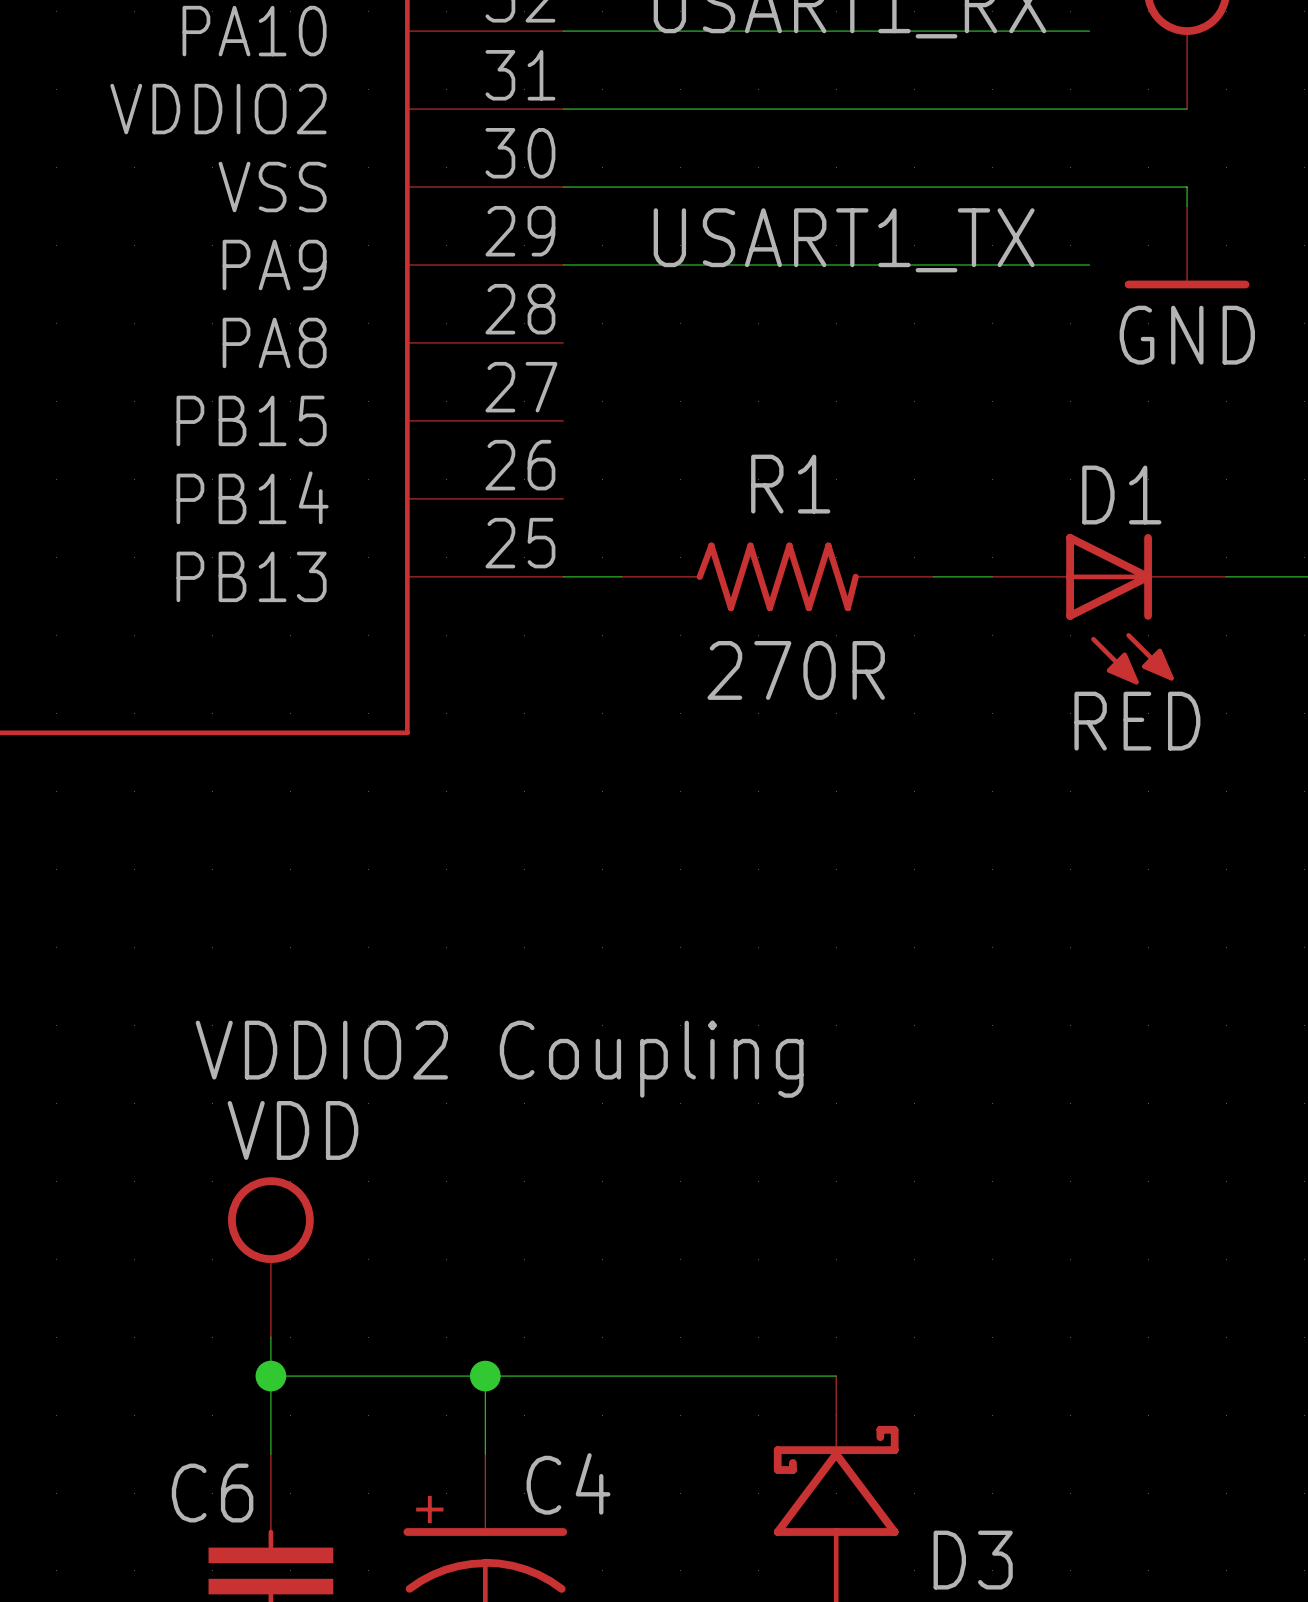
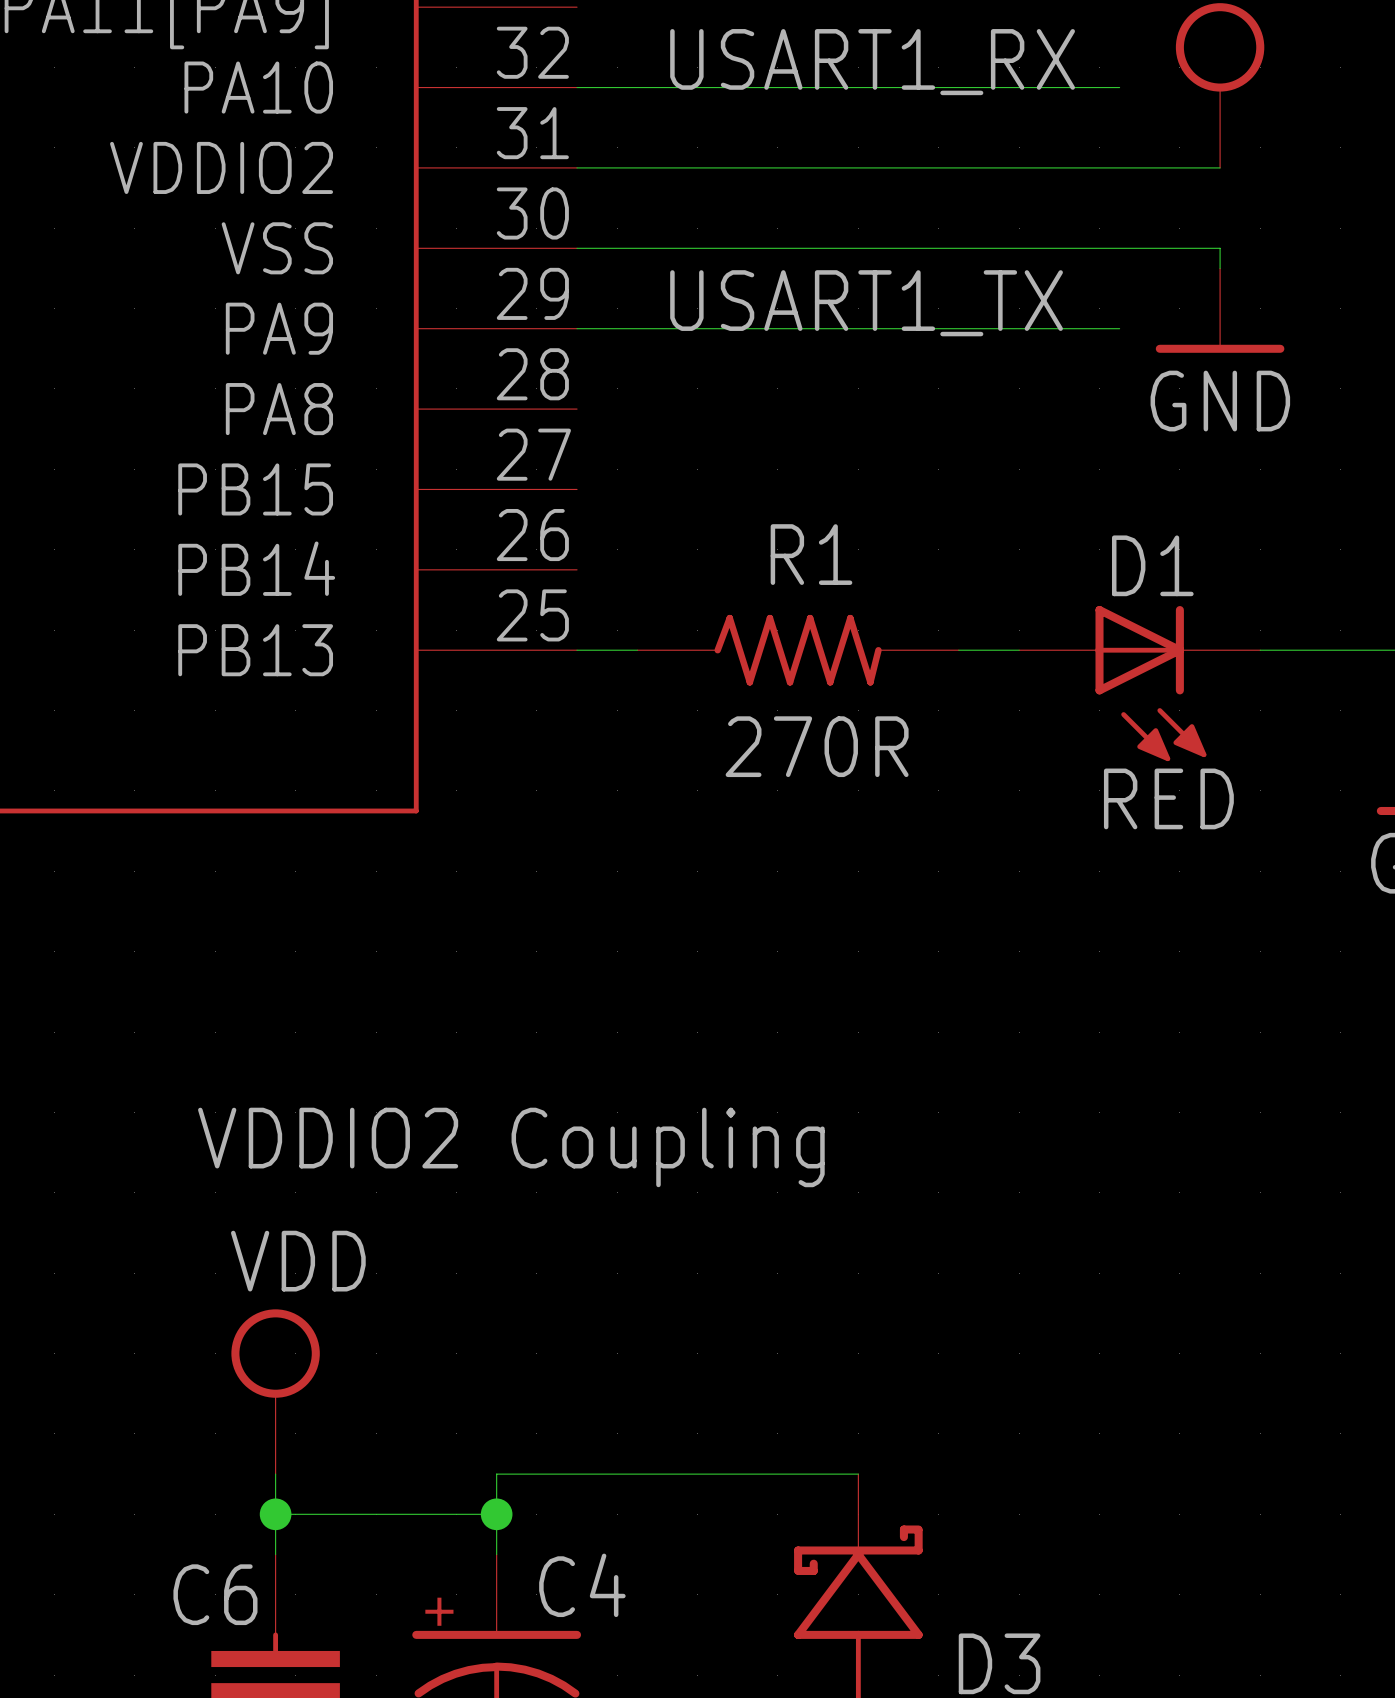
power symbol position: VDD (270, 1257) -> VDD (275, 1391)
wire: (270, 1337) (270, 1376) (485, 1376) -> none
junction position: (270, 1376) -> (275, 1514)
junction position: (485, 1376) -> (496, 1514)
wire: none -> (275, 1514) (496, 1514)

